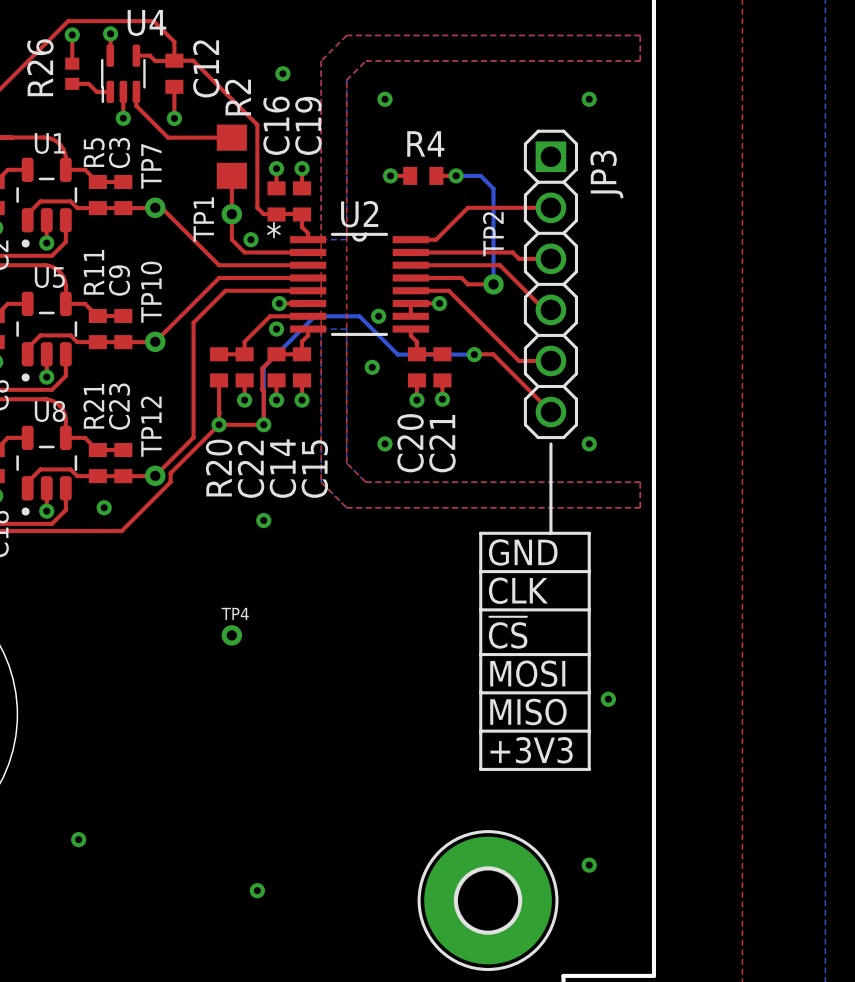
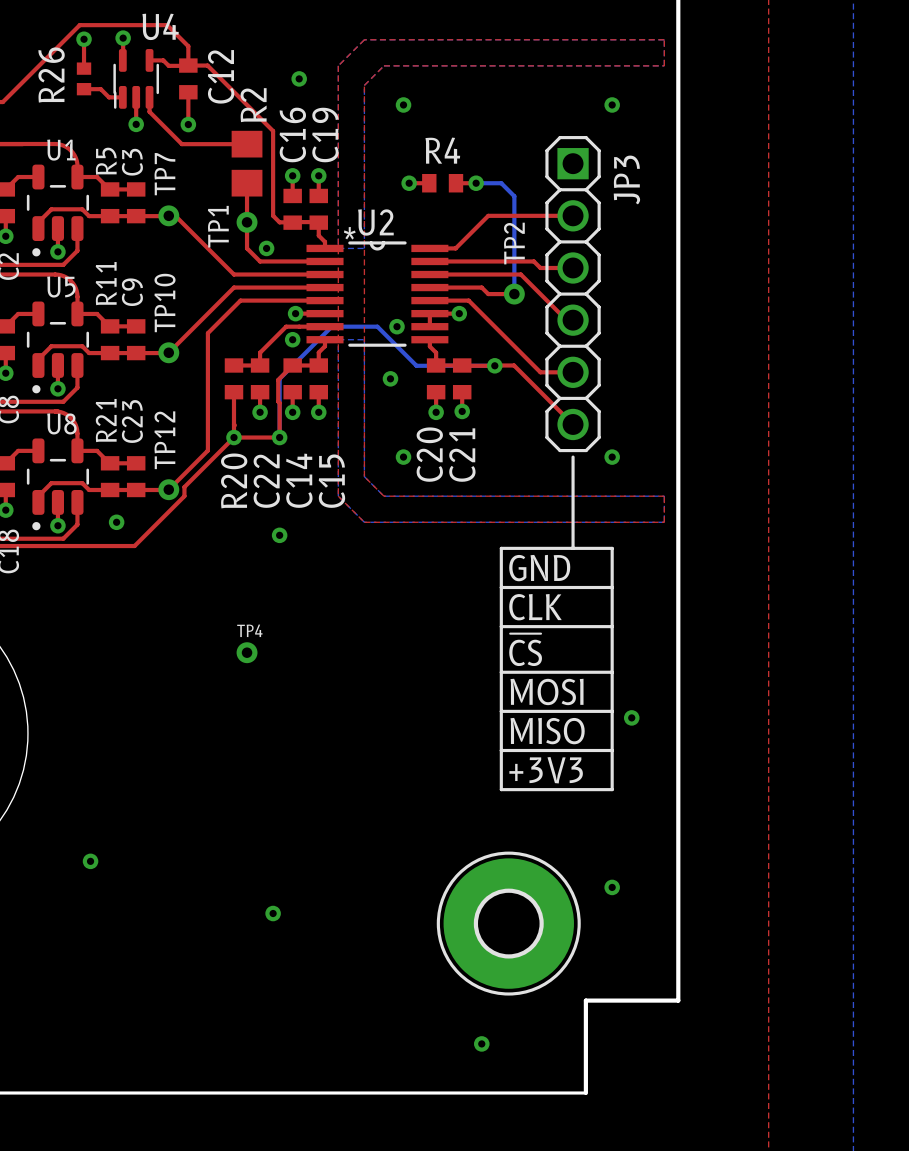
U2 text position: * (273, 230) -> * (349, 233)
top track: none -> (462, 365) (494, 365)

